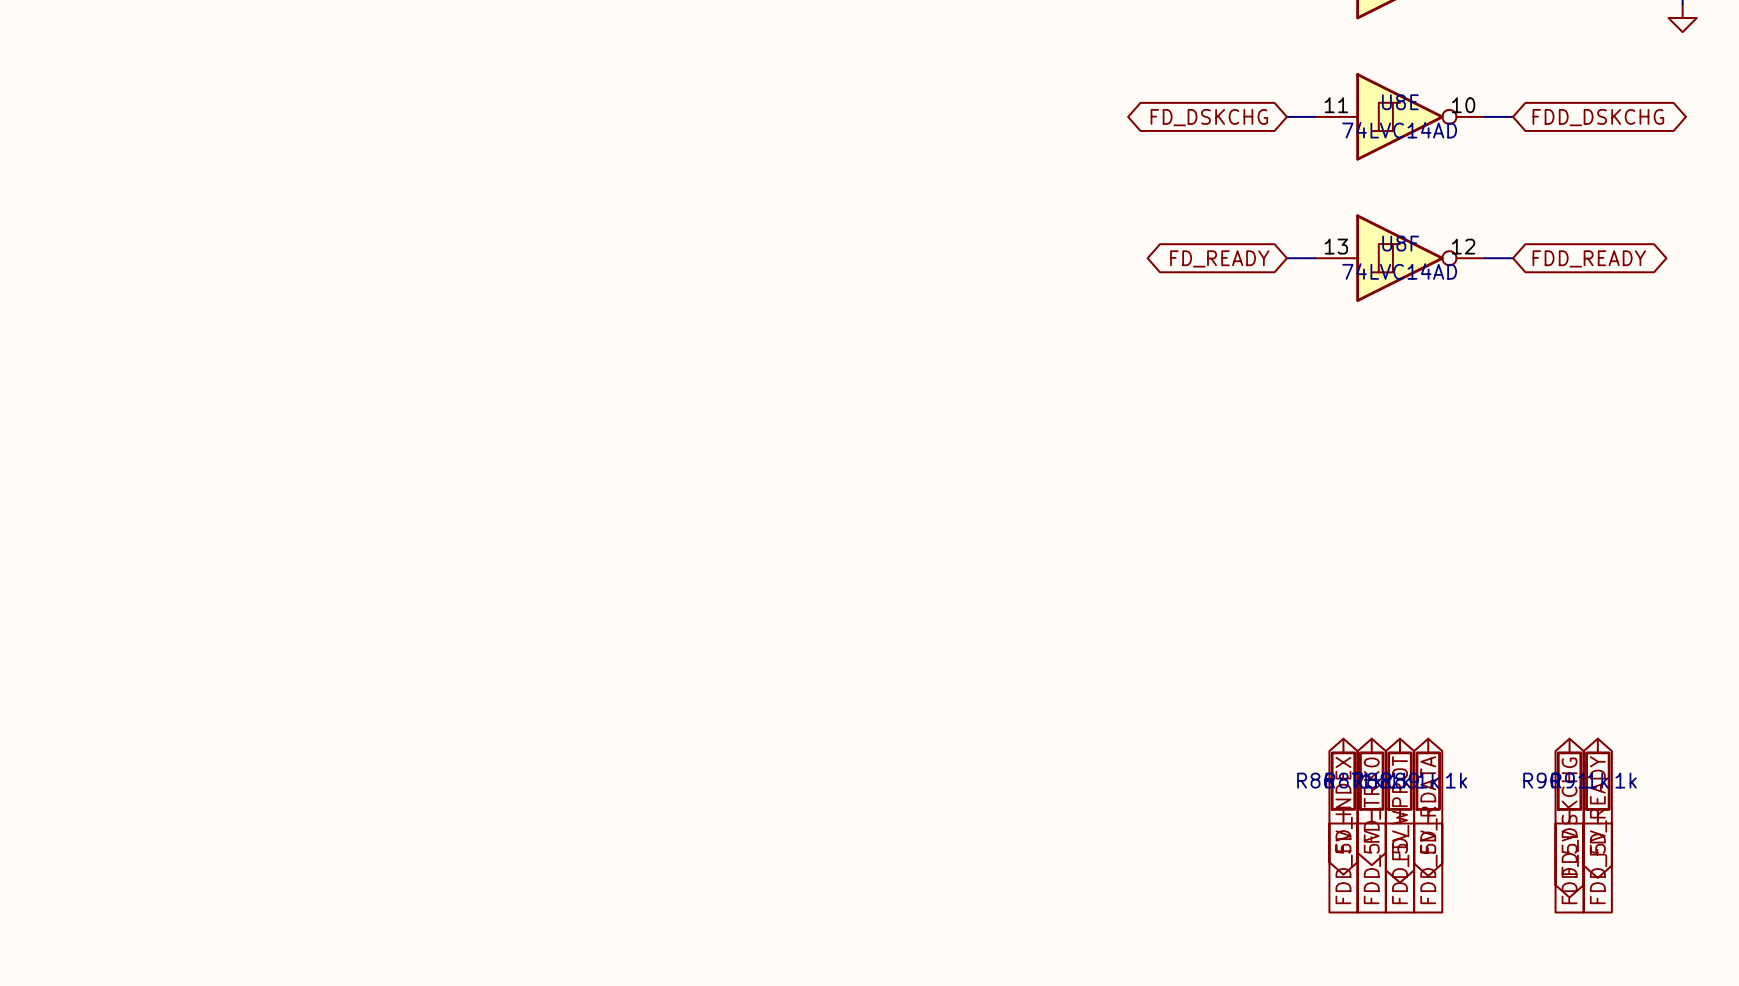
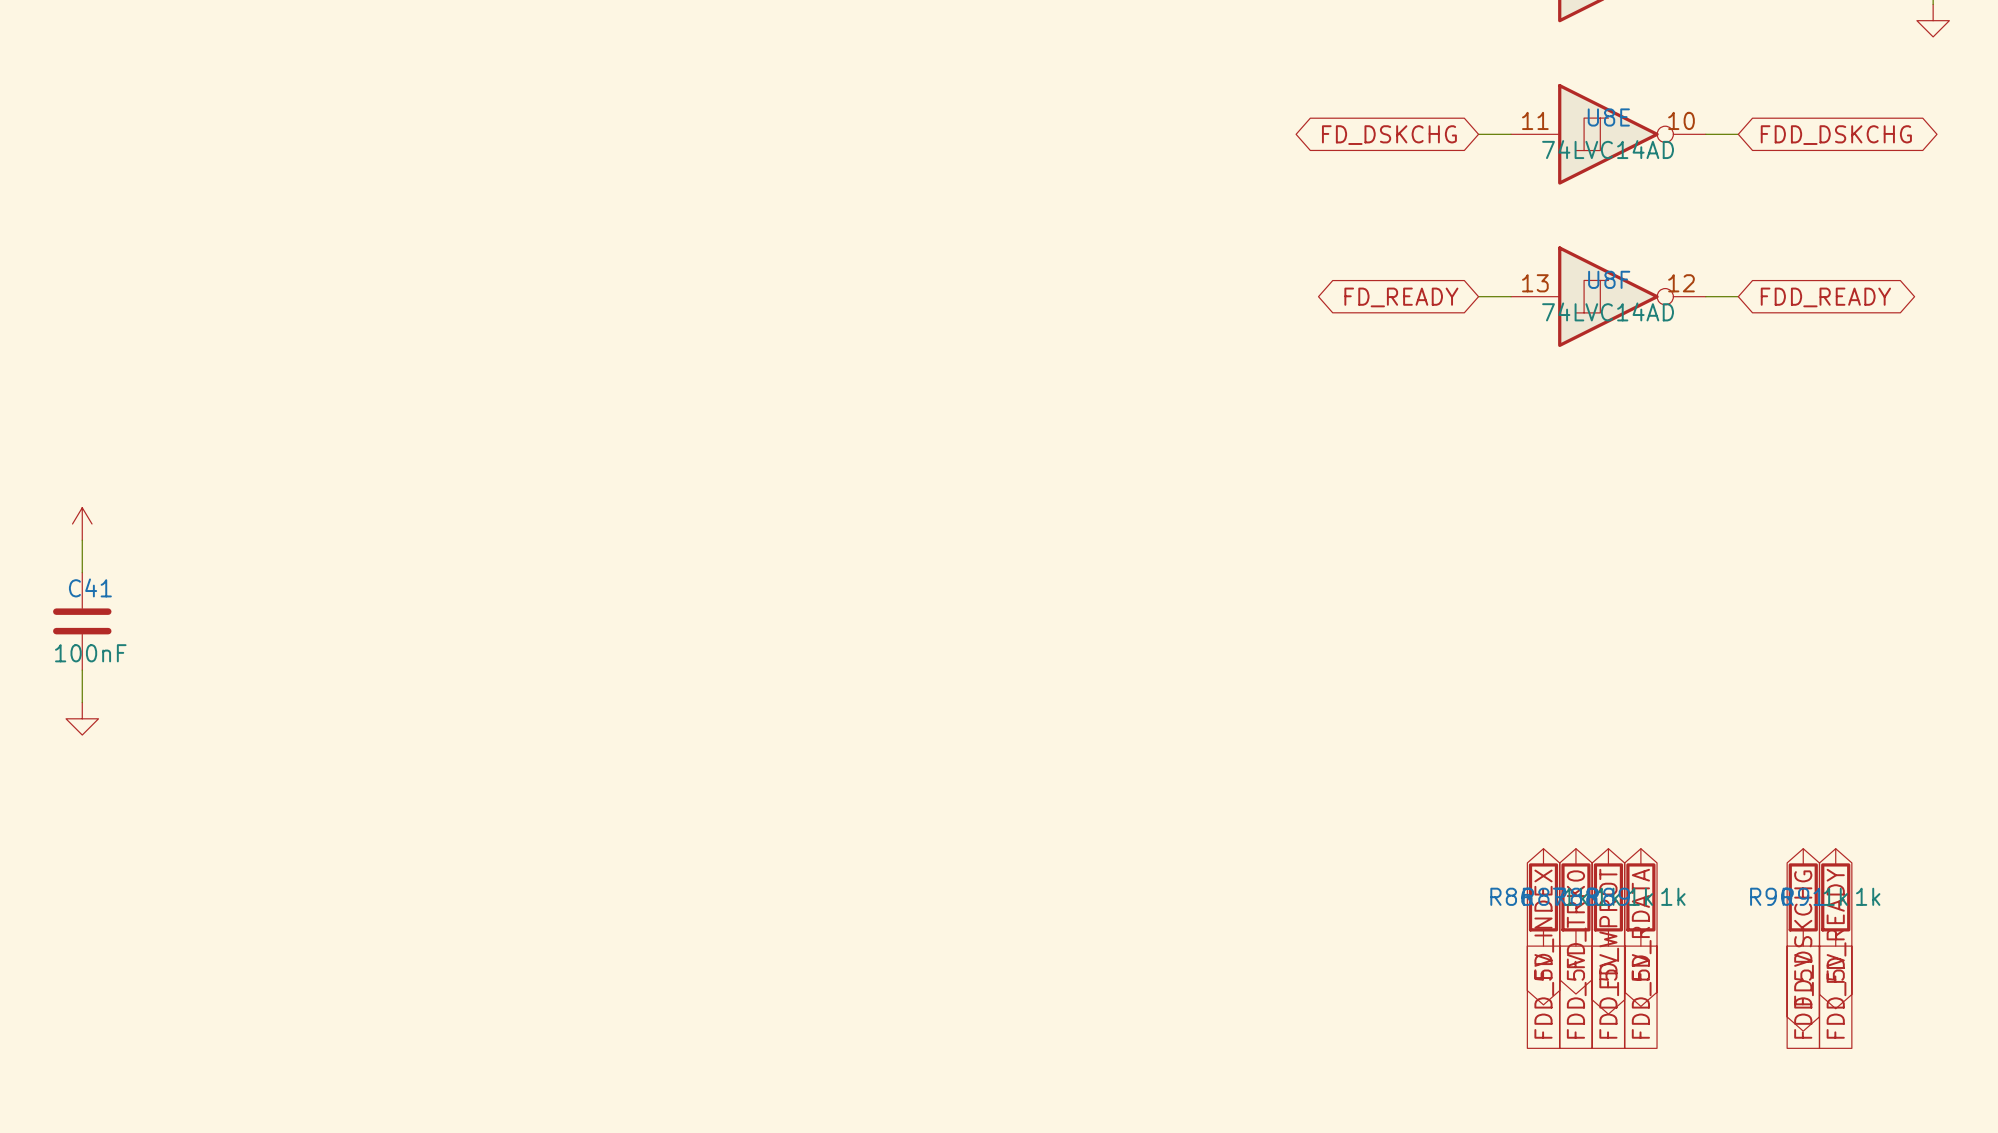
power symbol: none -> (82, 523)
wire: none -> (82, 540) (82, 572)
C41: none -> 100nF (82, 621)
wire: none -> (82, 670) (82, 702)
power symbol: none -> (82, 718)

